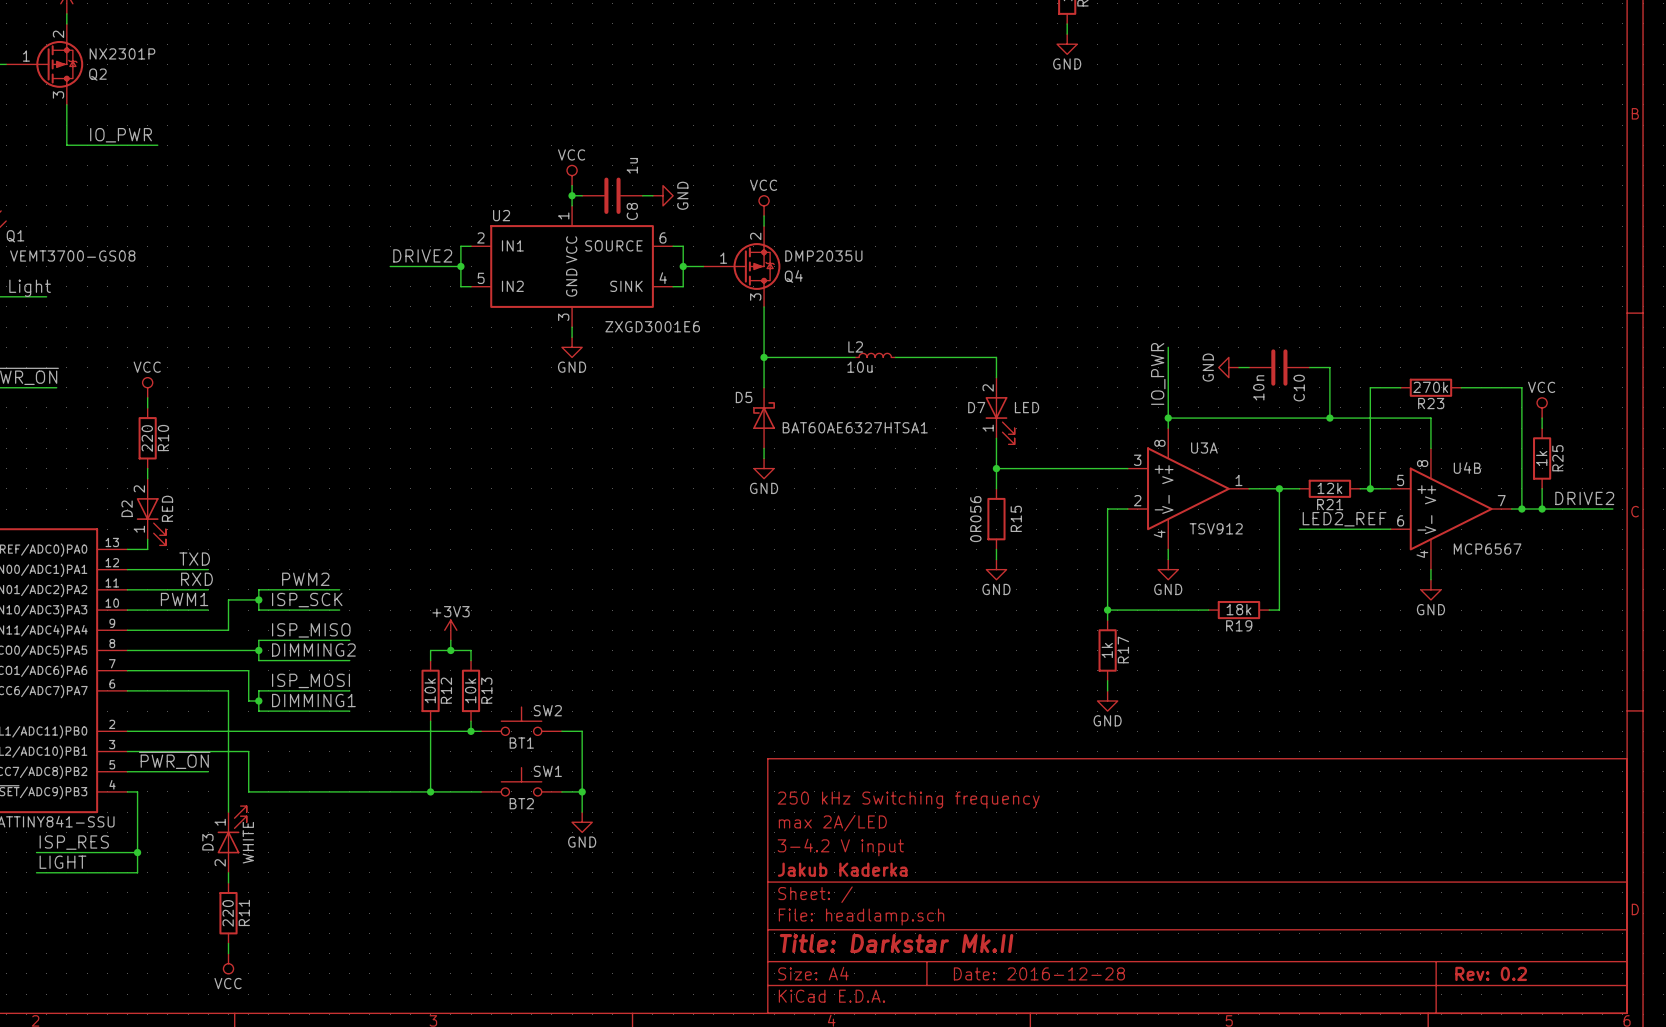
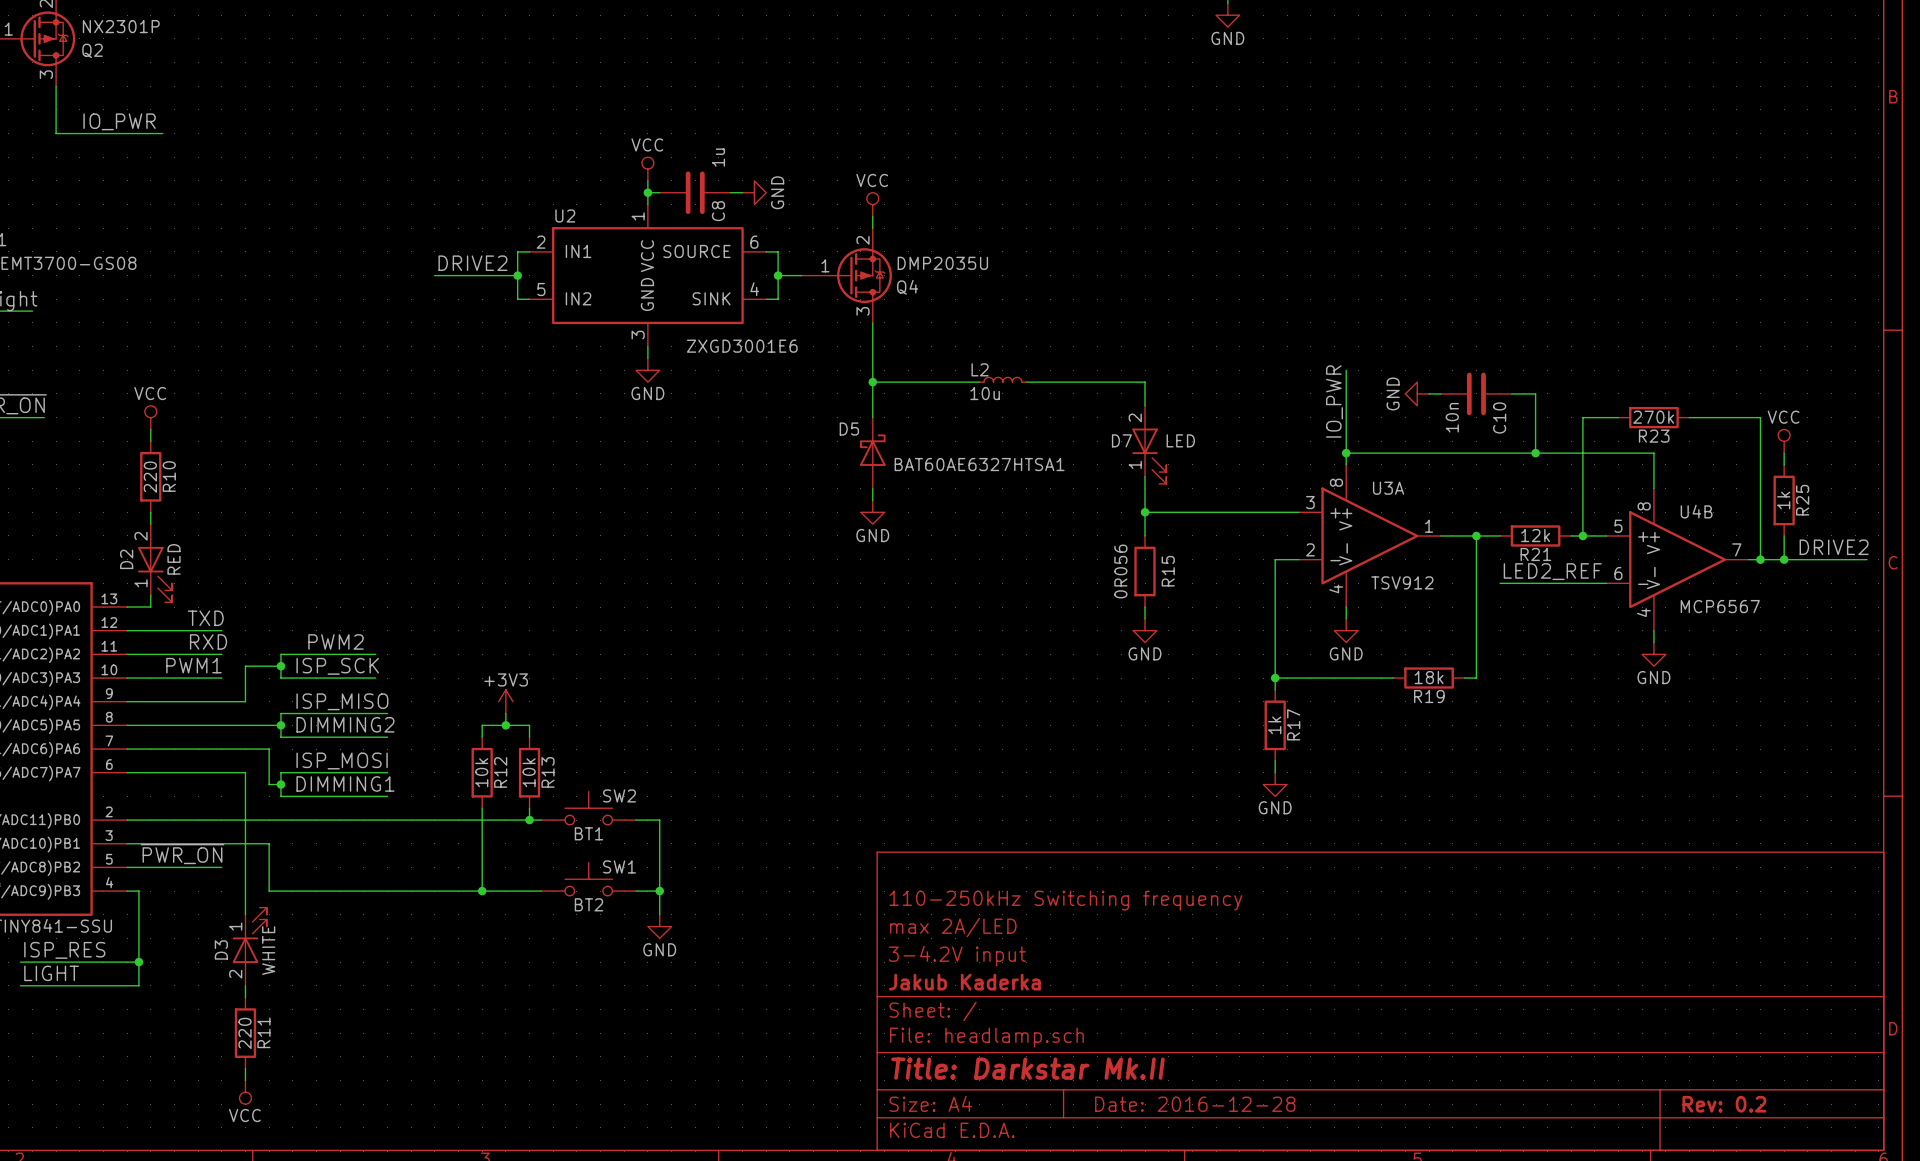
title block: 250 kHz Switching frequency (908, 800) -> 110-250kHz Switching frequency (1065, 900)
title block: 3-4.2 V input (840, 847) -> 3-4.2V input (957, 956)

